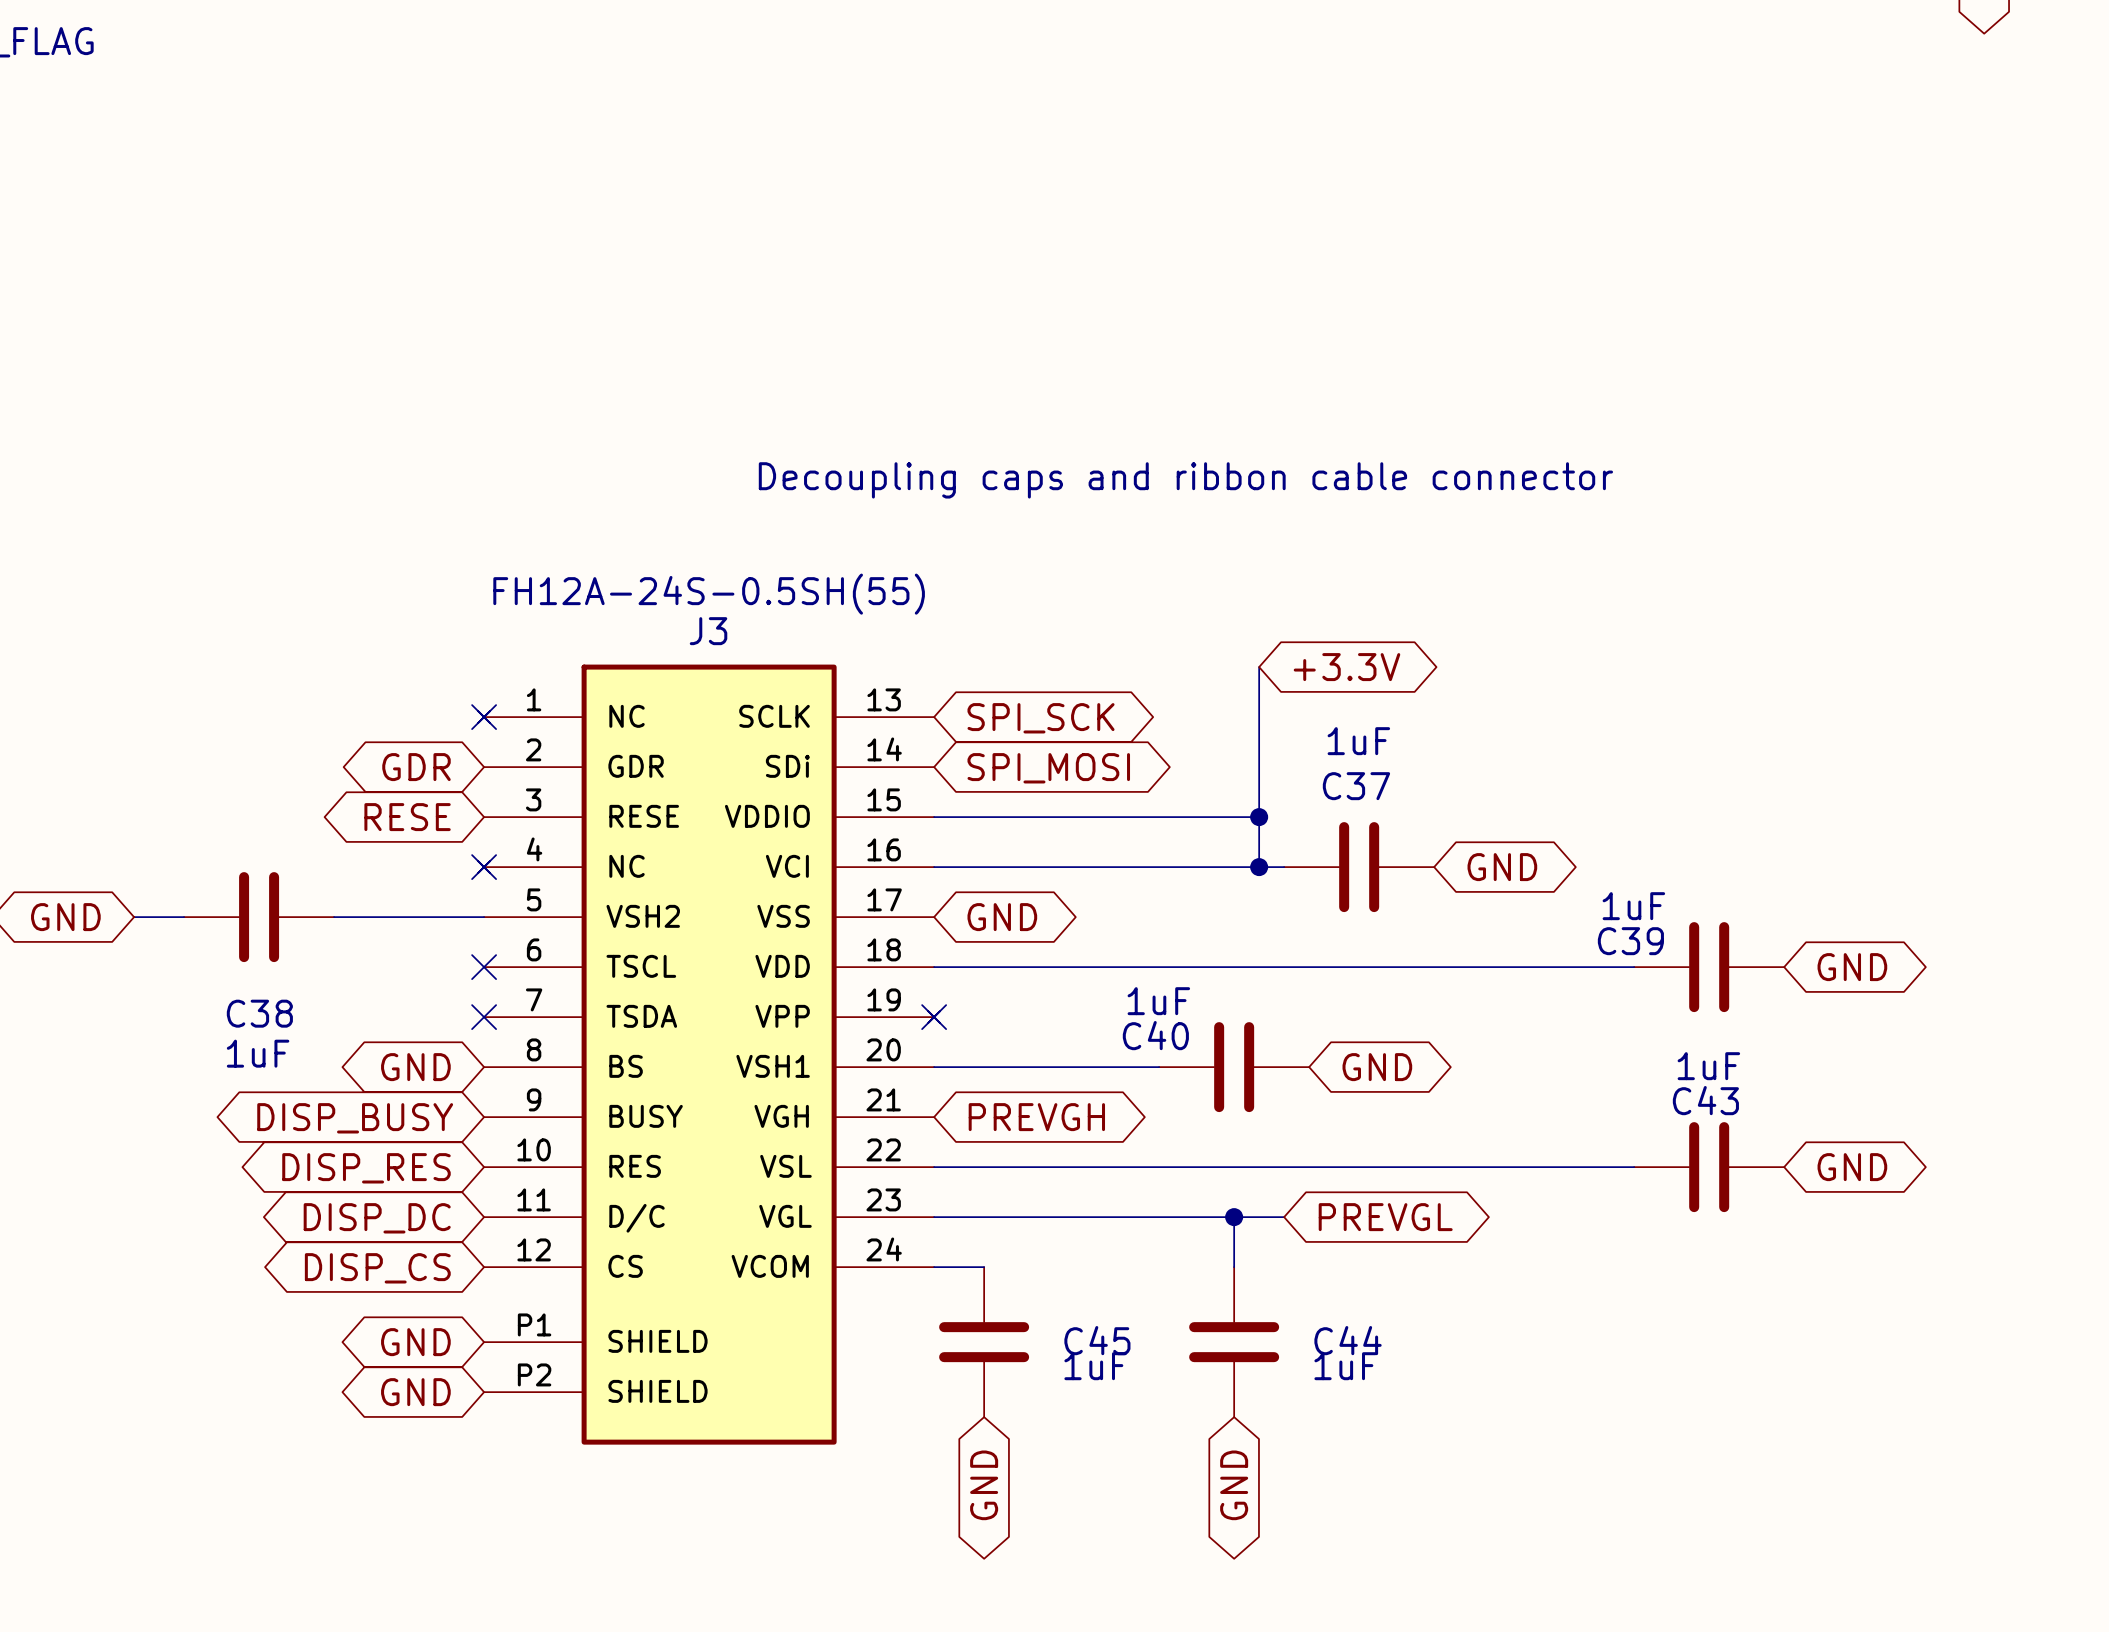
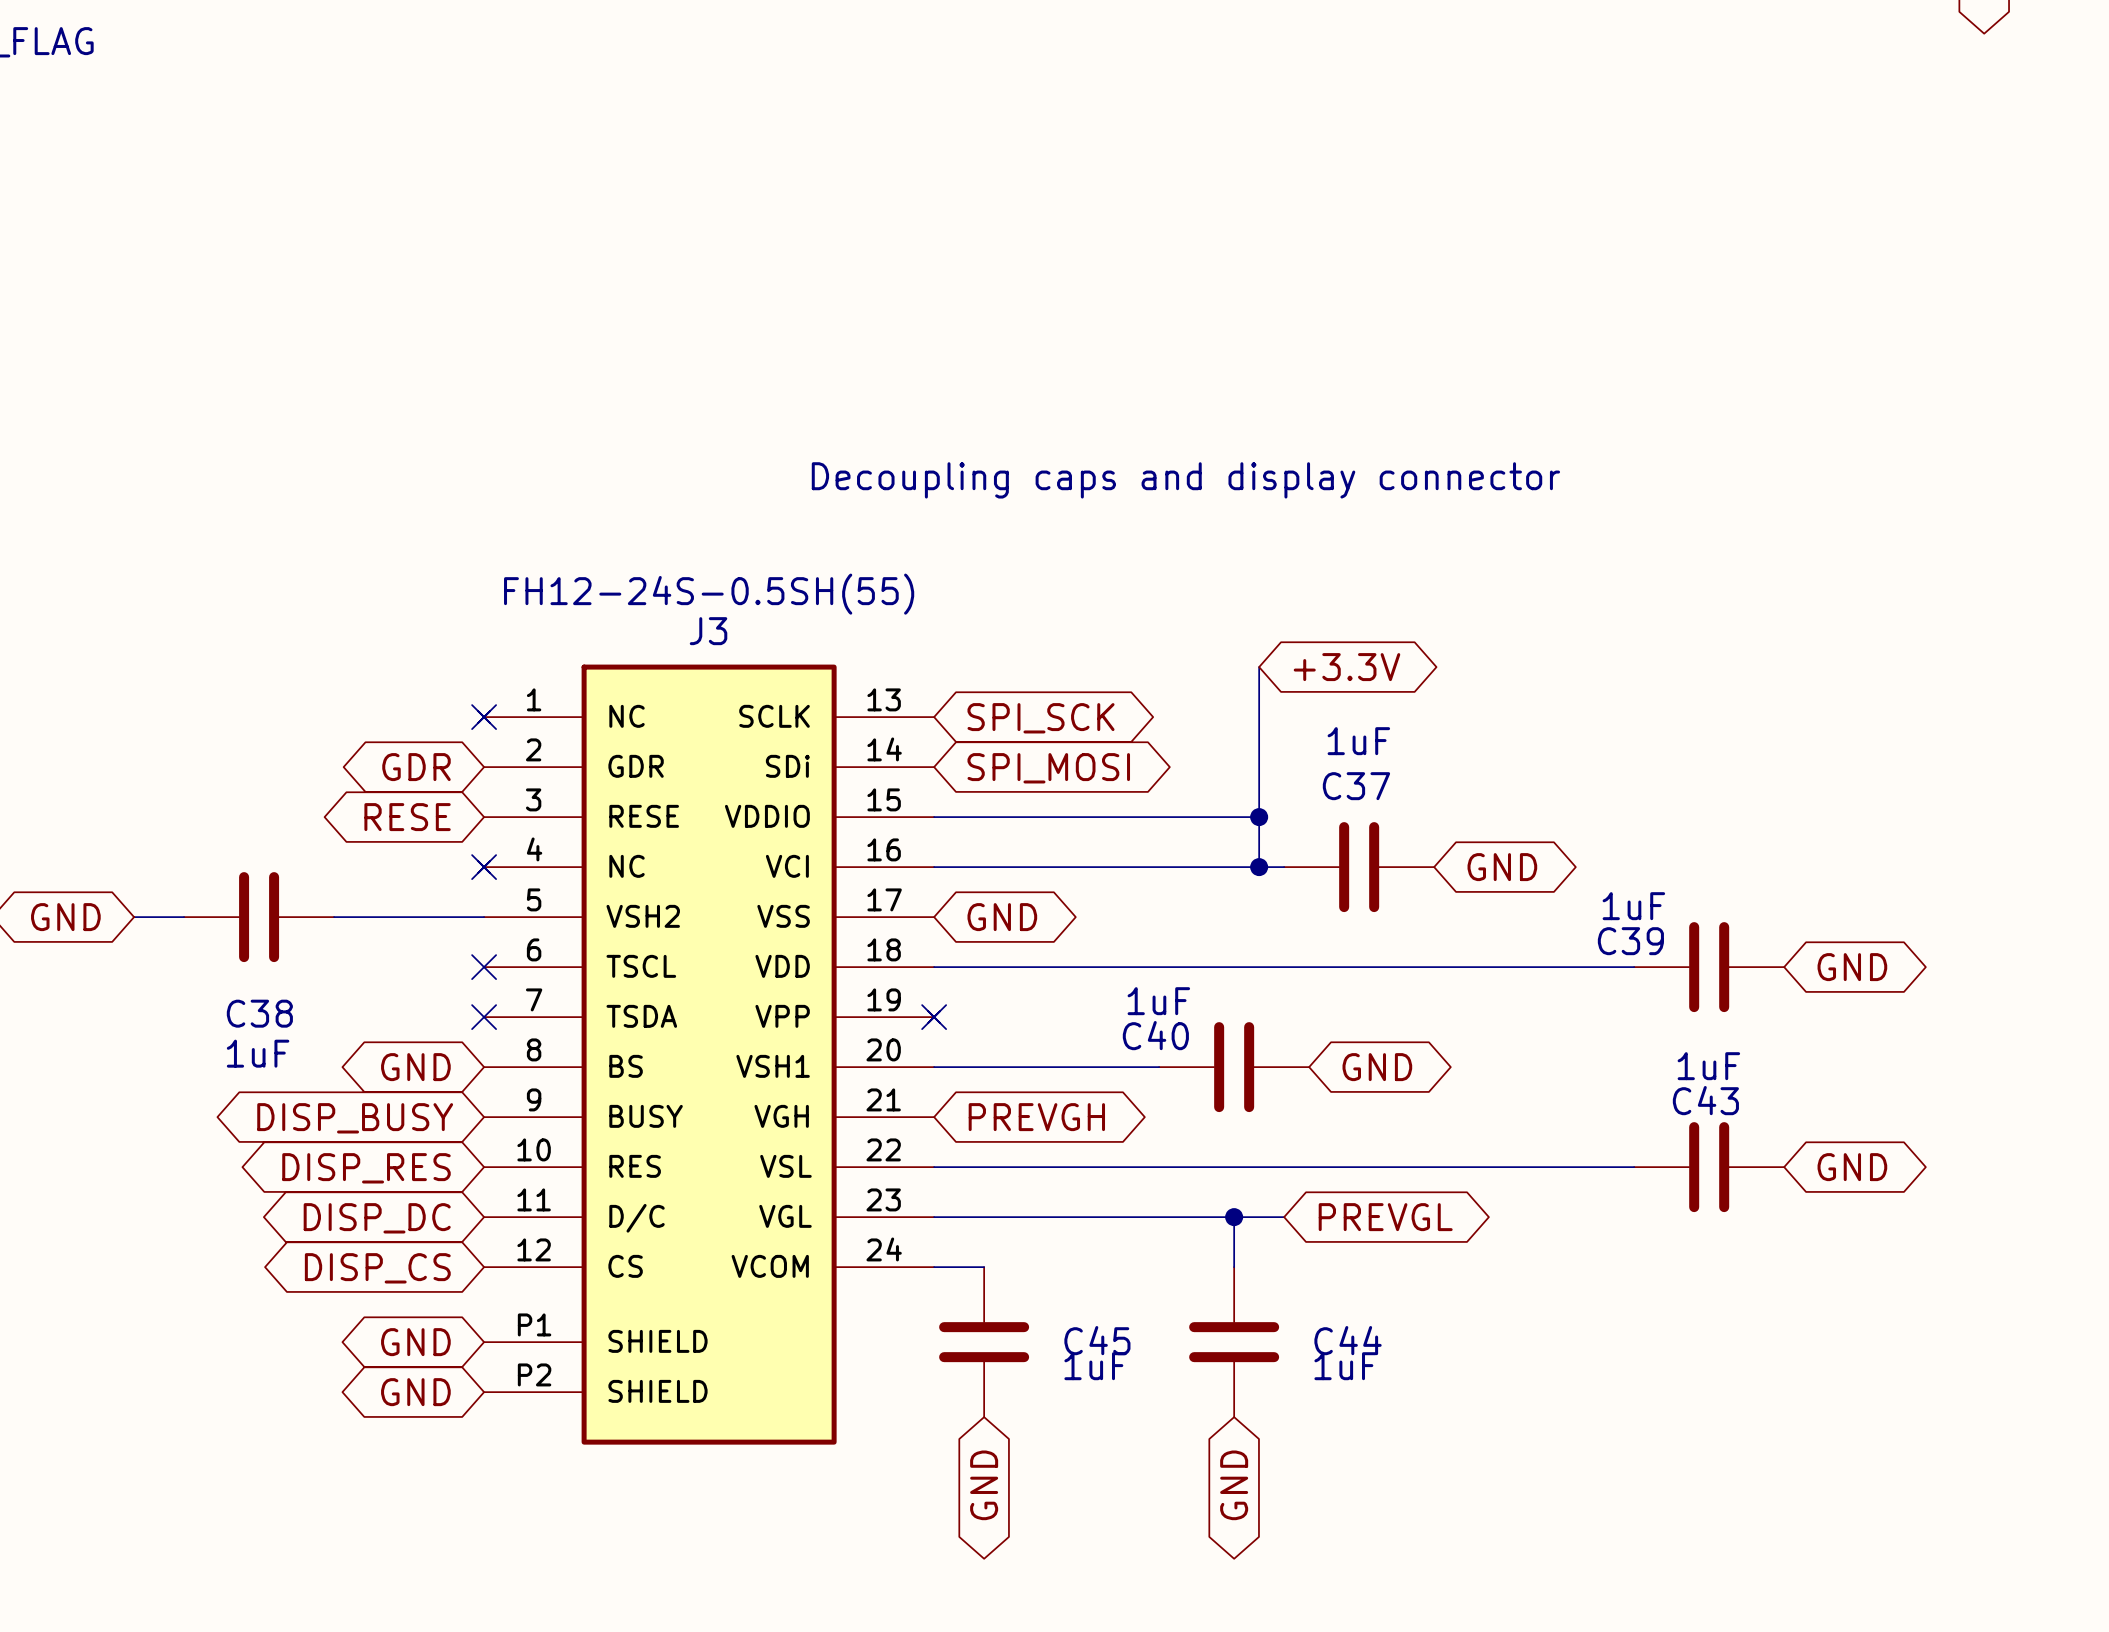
text: Decoupling caps and ribbon cable connector (1185, 480) -> Decoupling caps and display connector (1185, 480)
J3 value: FH12A-24S-0.5SH(55) (709, 594) -> FH12-24S-0.5SH(55) (709, 594)

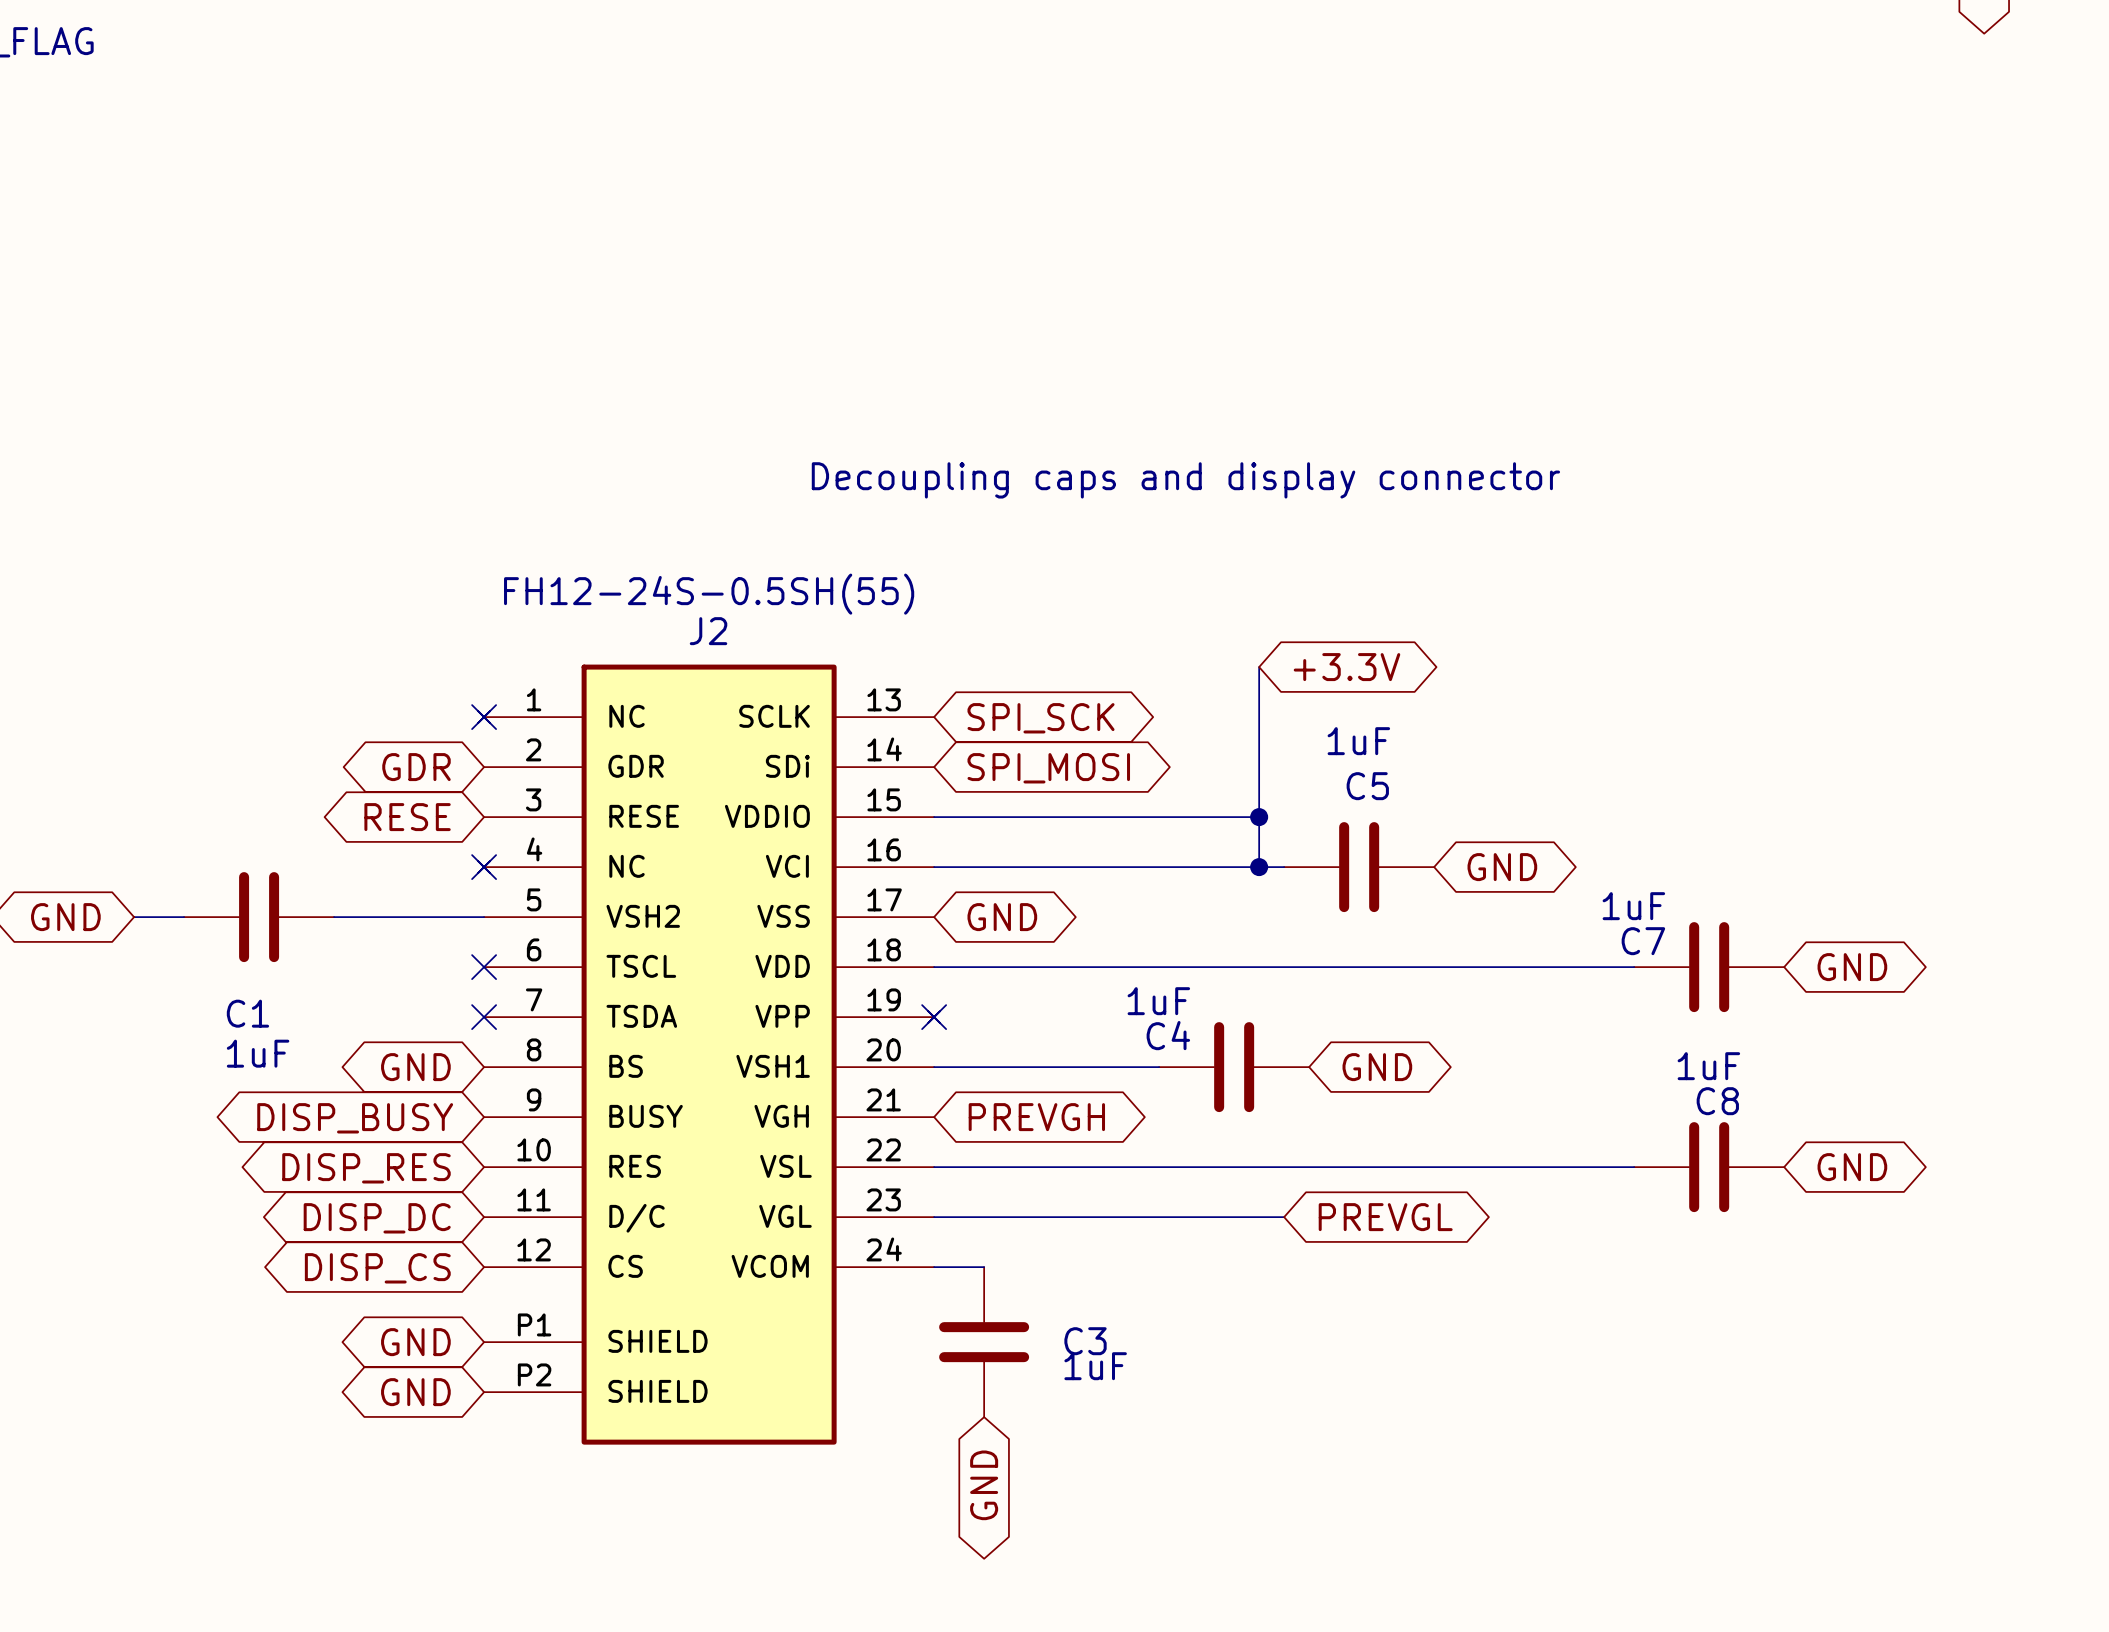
J3 name: J3 (708, 631) -> J2 (708, 631)
C37 name: C37 (1356, 786) -> C5 (1367, 786)
C39 name: C39 (1630, 941) -> C7 (1643, 941)
C38 name: C38 (259, 1013) -> C1 (247, 1013)
C40 name: C40 (1155, 1035) -> C4 (1168, 1035)
C43 name: C43 (1705, 1100) -> C8 (1717, 1101)
wire: (1234, 1217) (1234, 1267) -> none
junction: (1234, 1217) -> none
C45 name: C45 (1097, 1340) -> C3 (1085, 1341)
C44: 1uF (1234, 1342) -> none
global label: GND (1234, 1485) -> none

